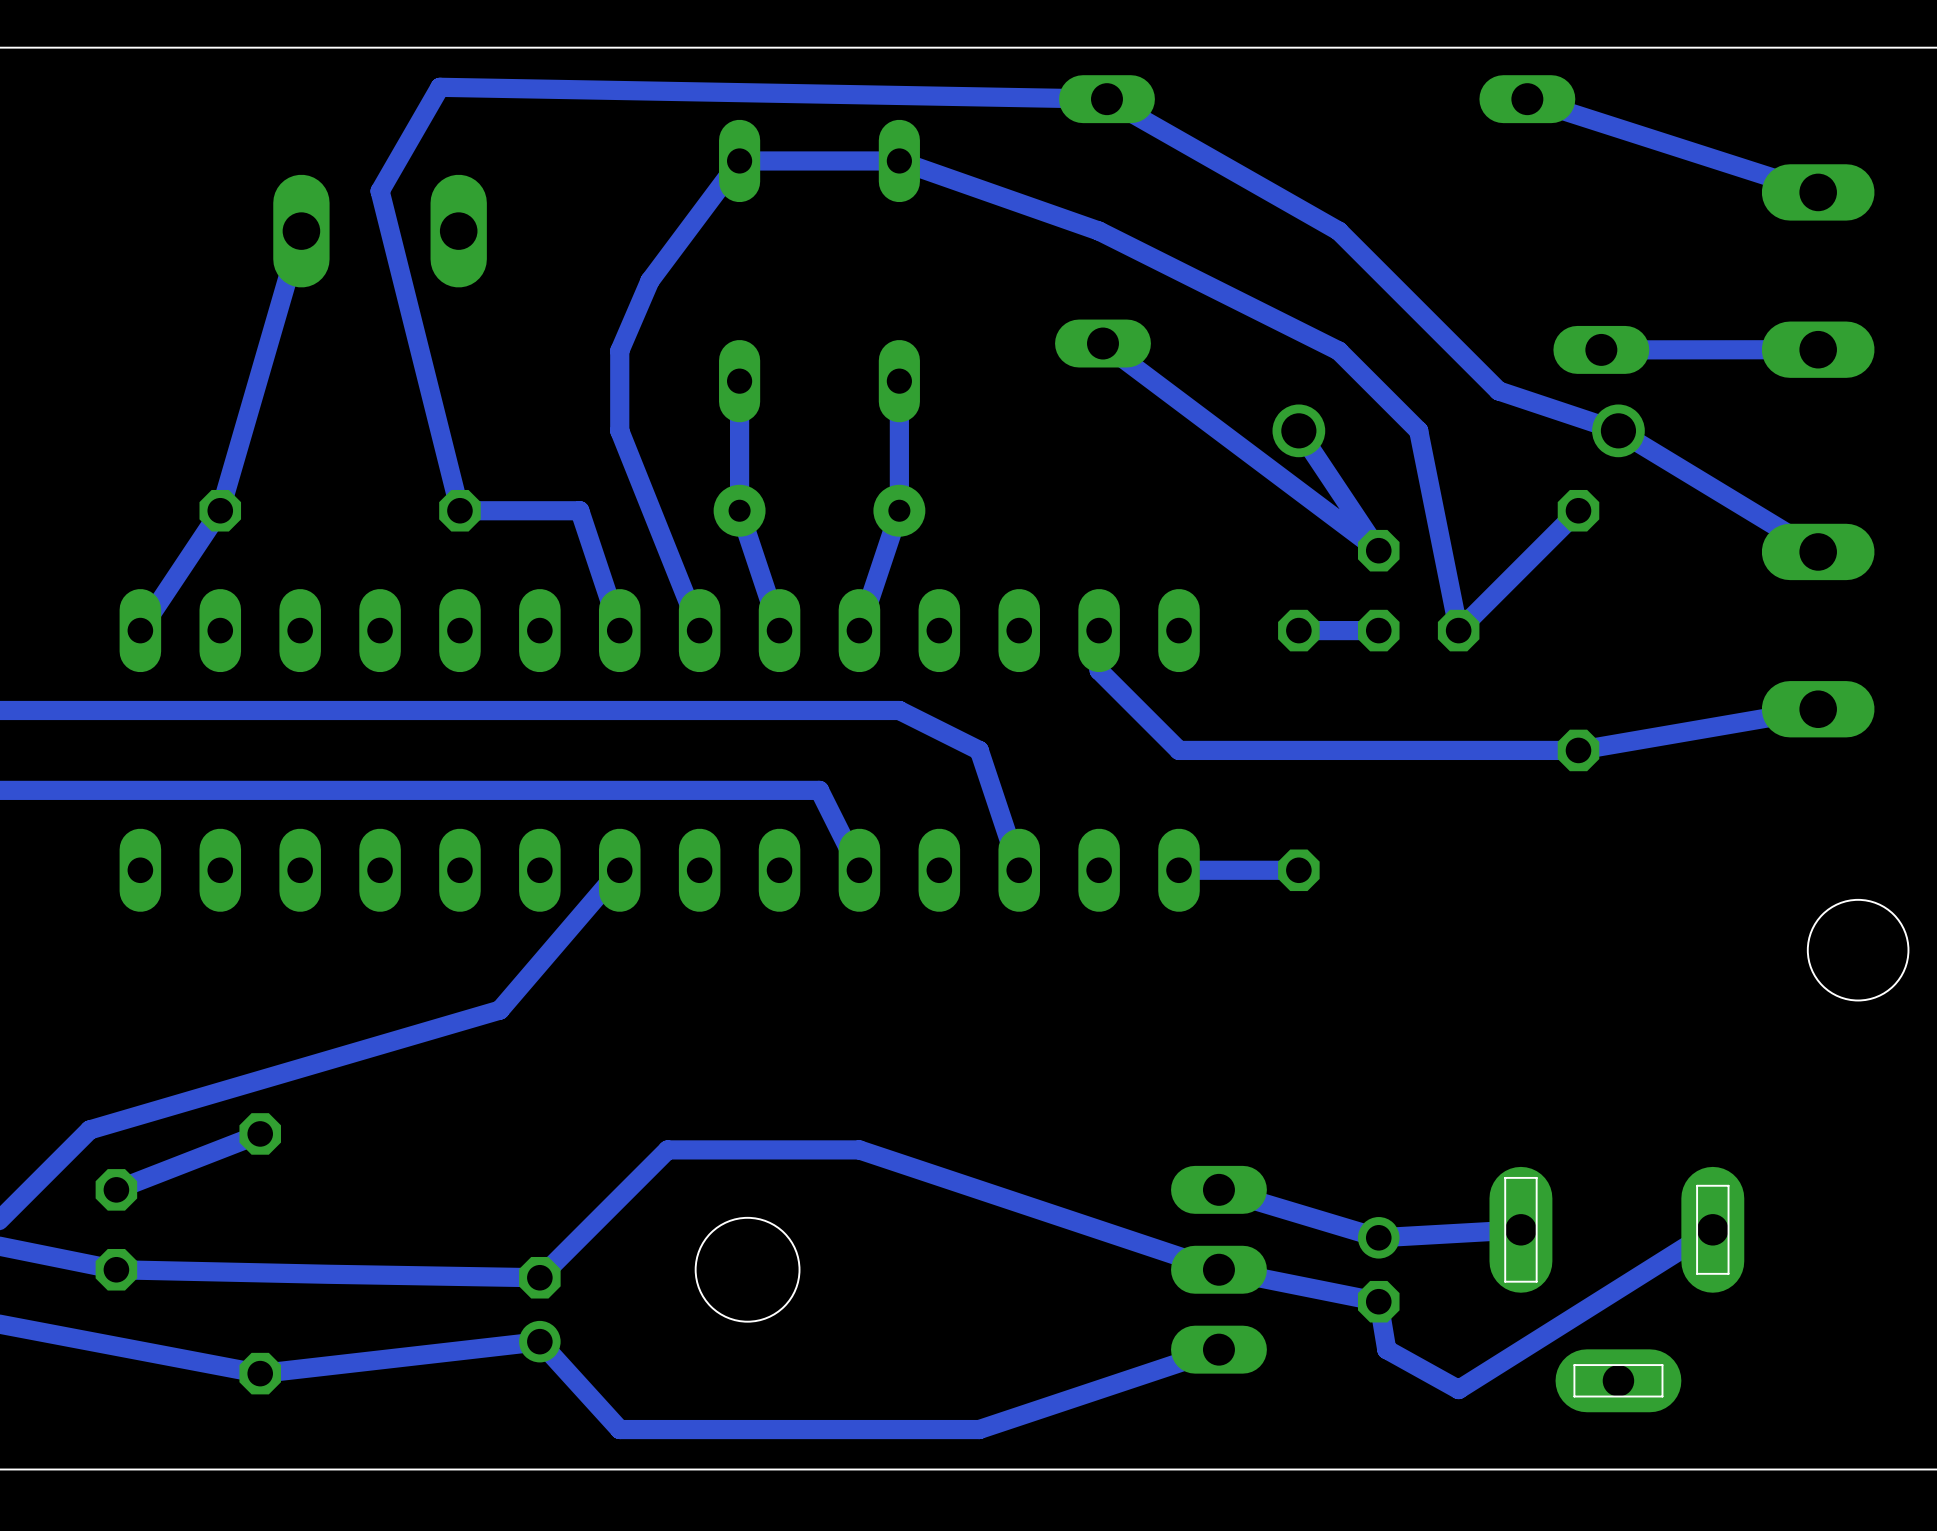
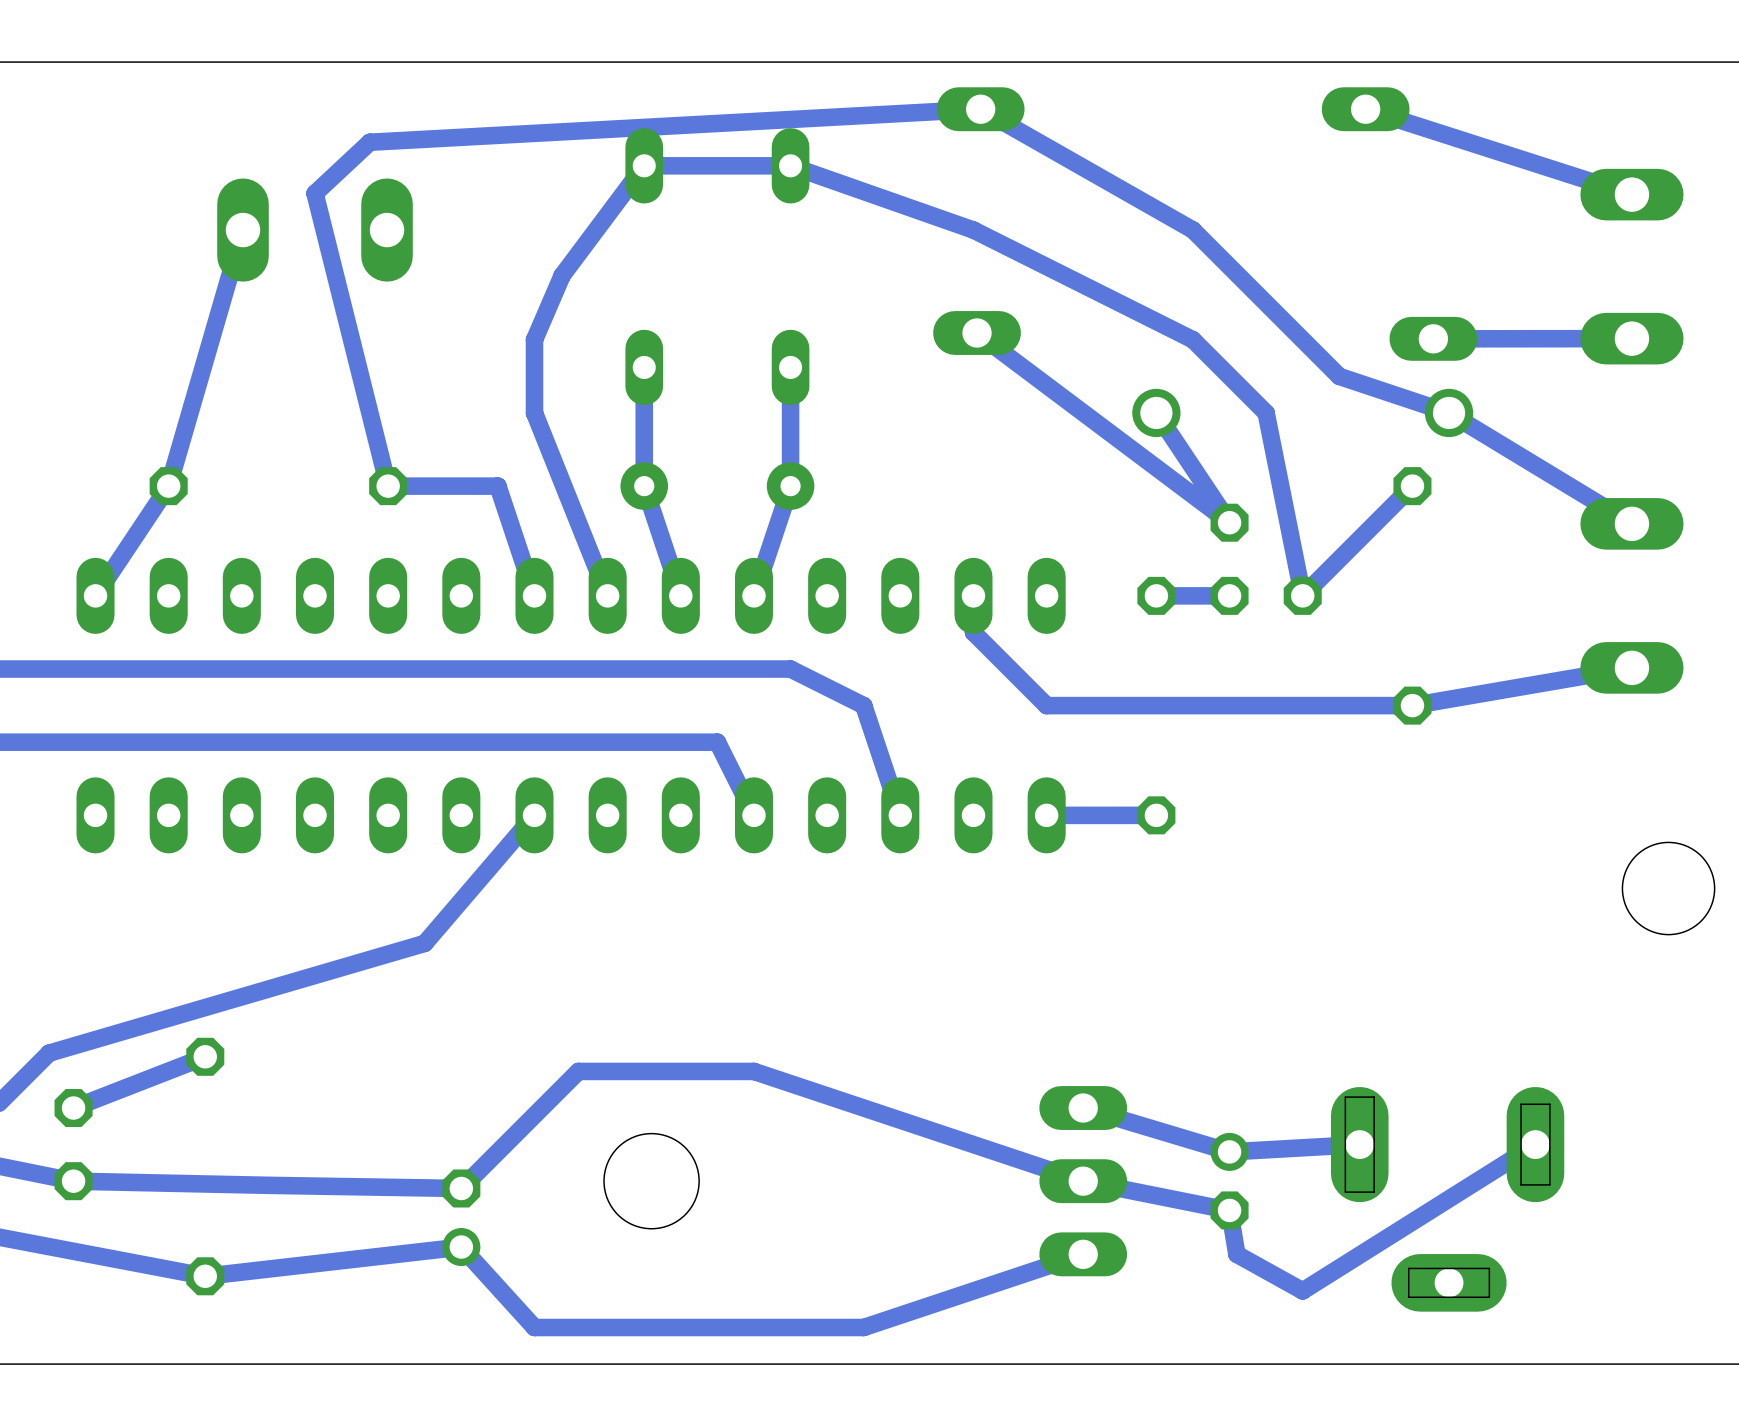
track: (1106, 99) (439, 87) (380, 191) -> (980, 109) (369, 142) (315, 193)

